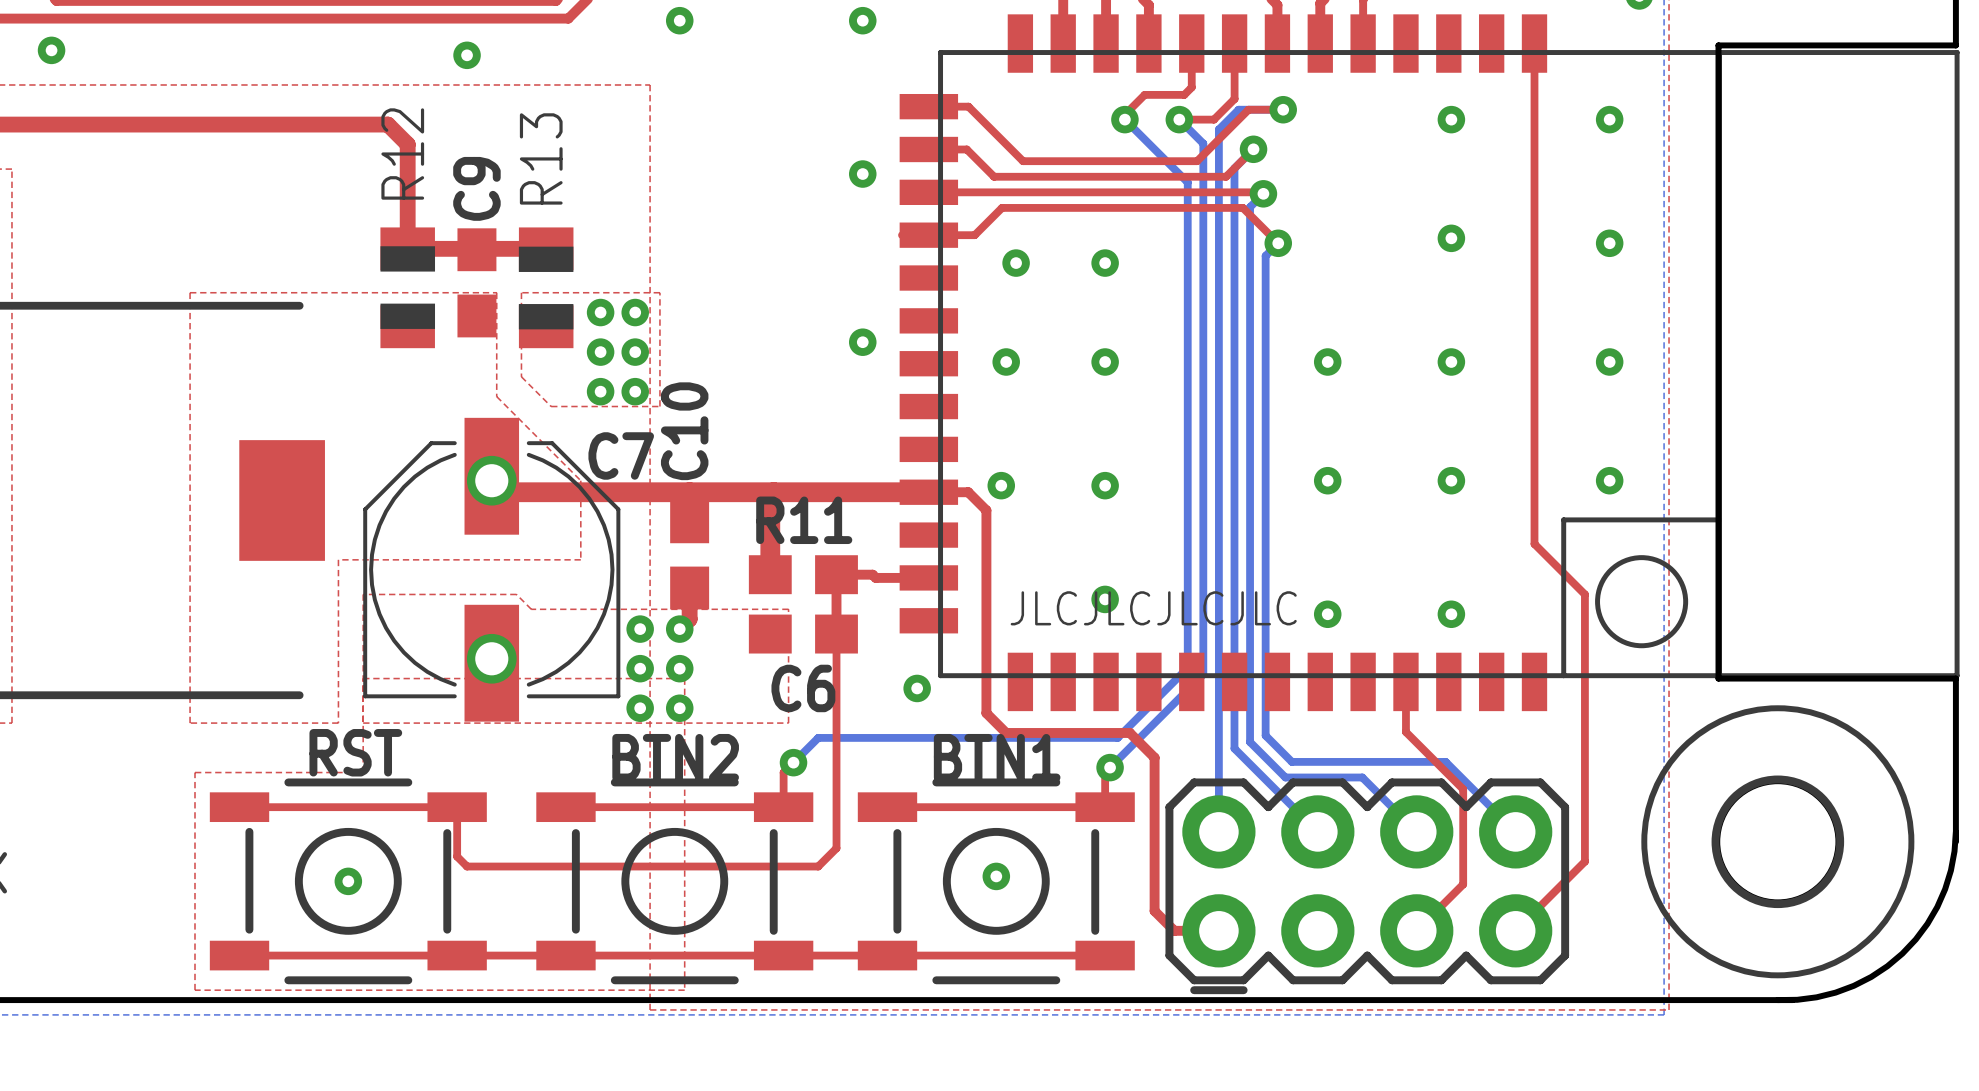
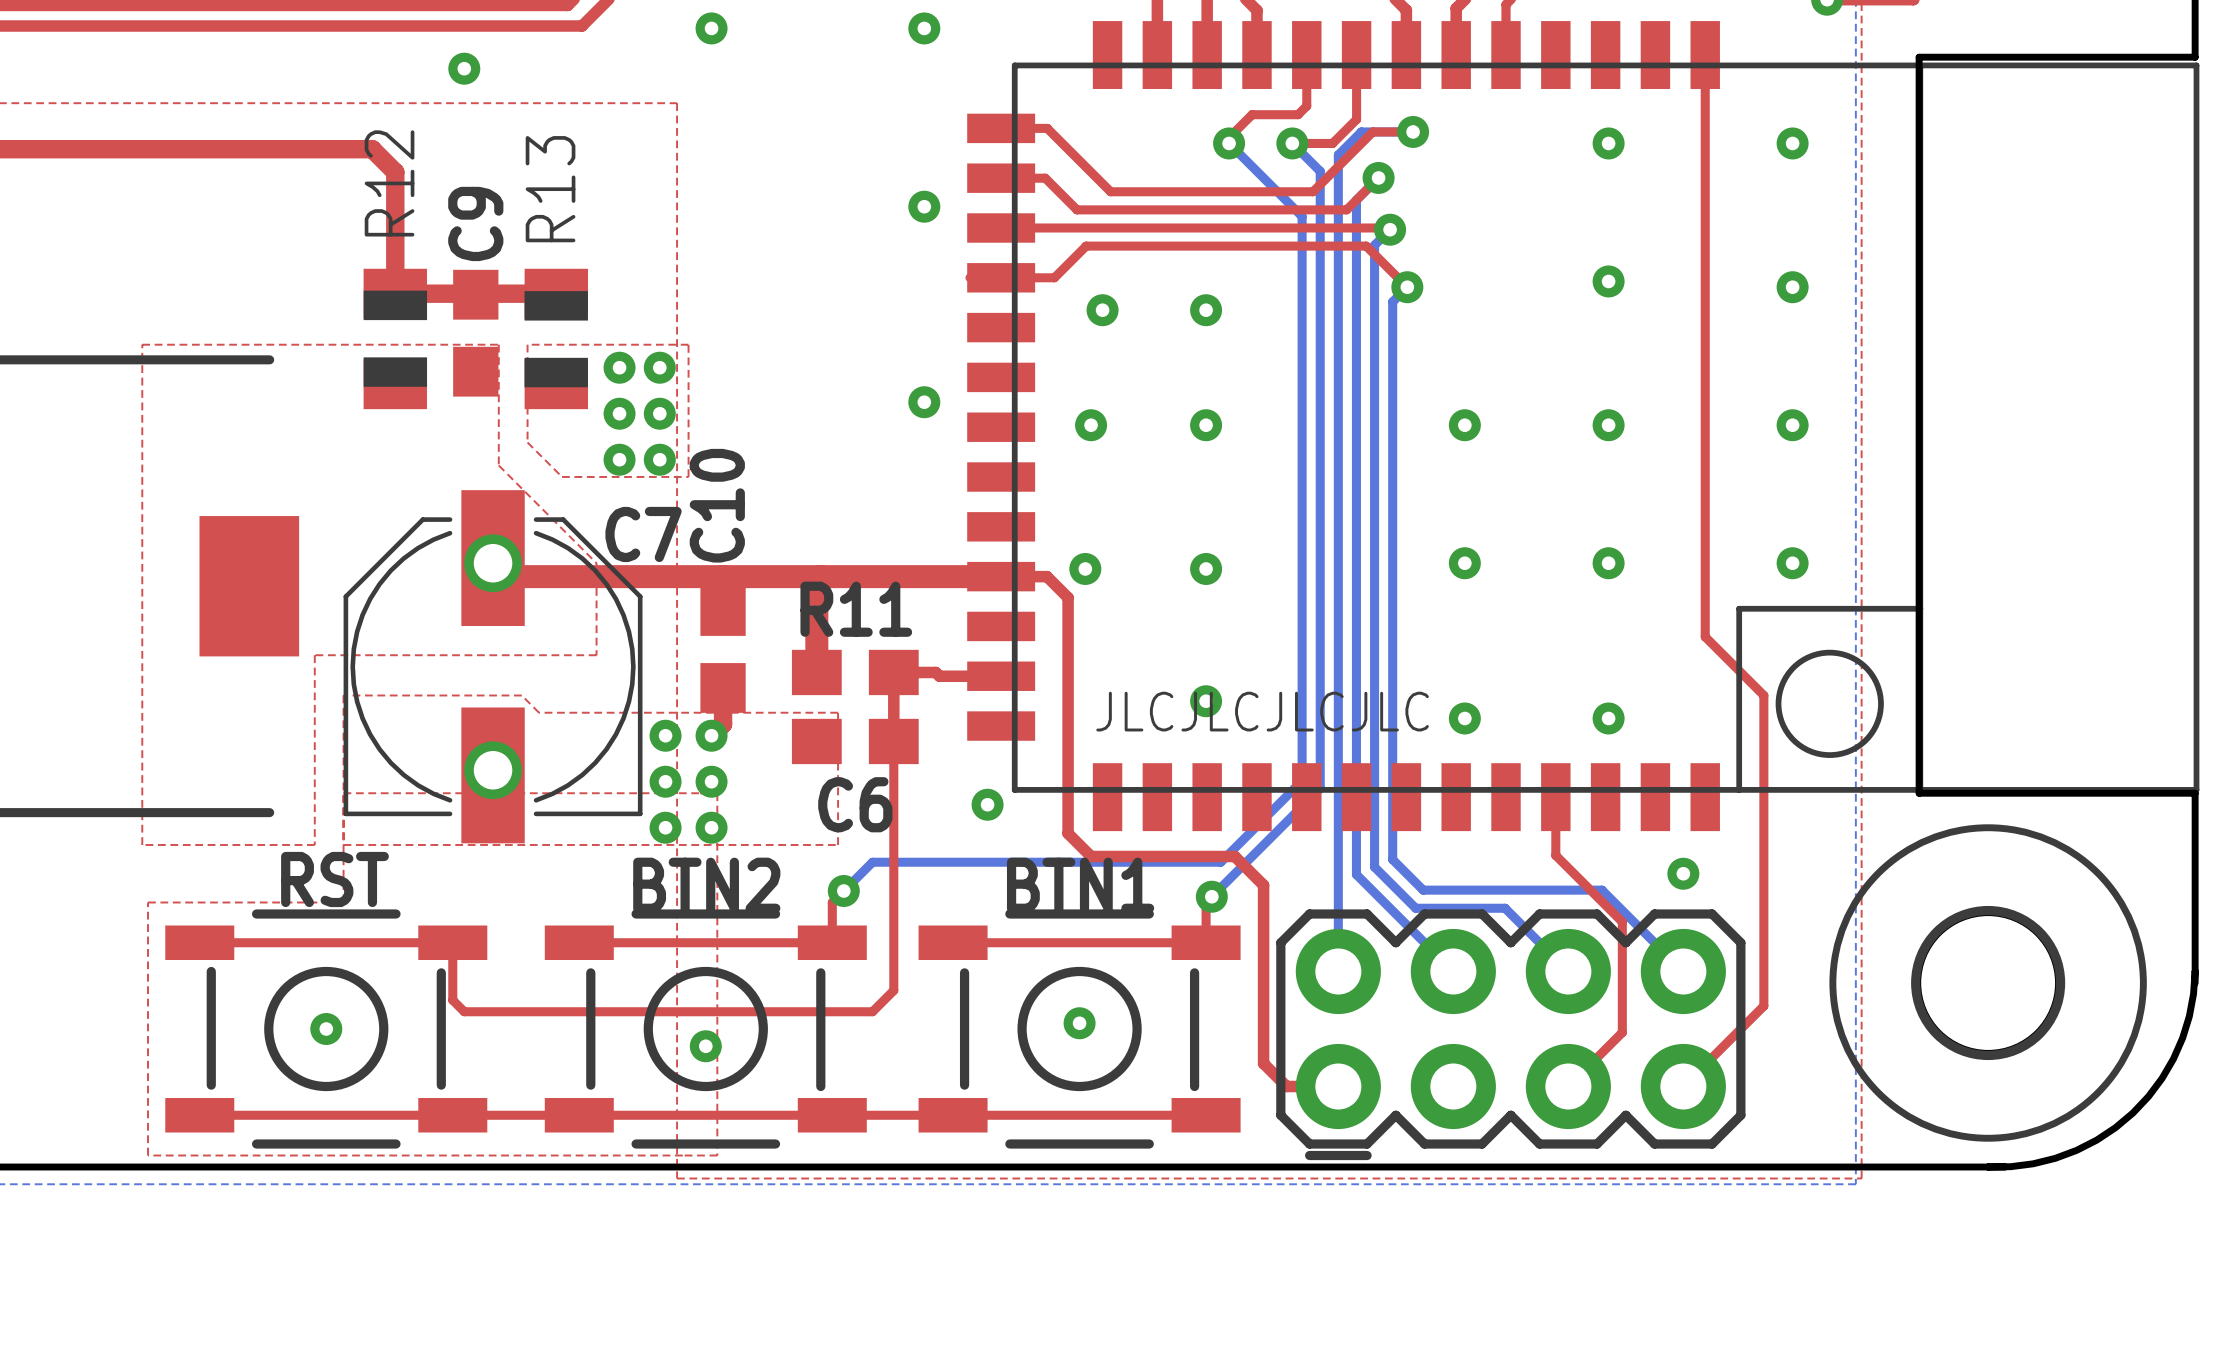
via: none -> (1683, 873)
via: none -> (705, 1046)

